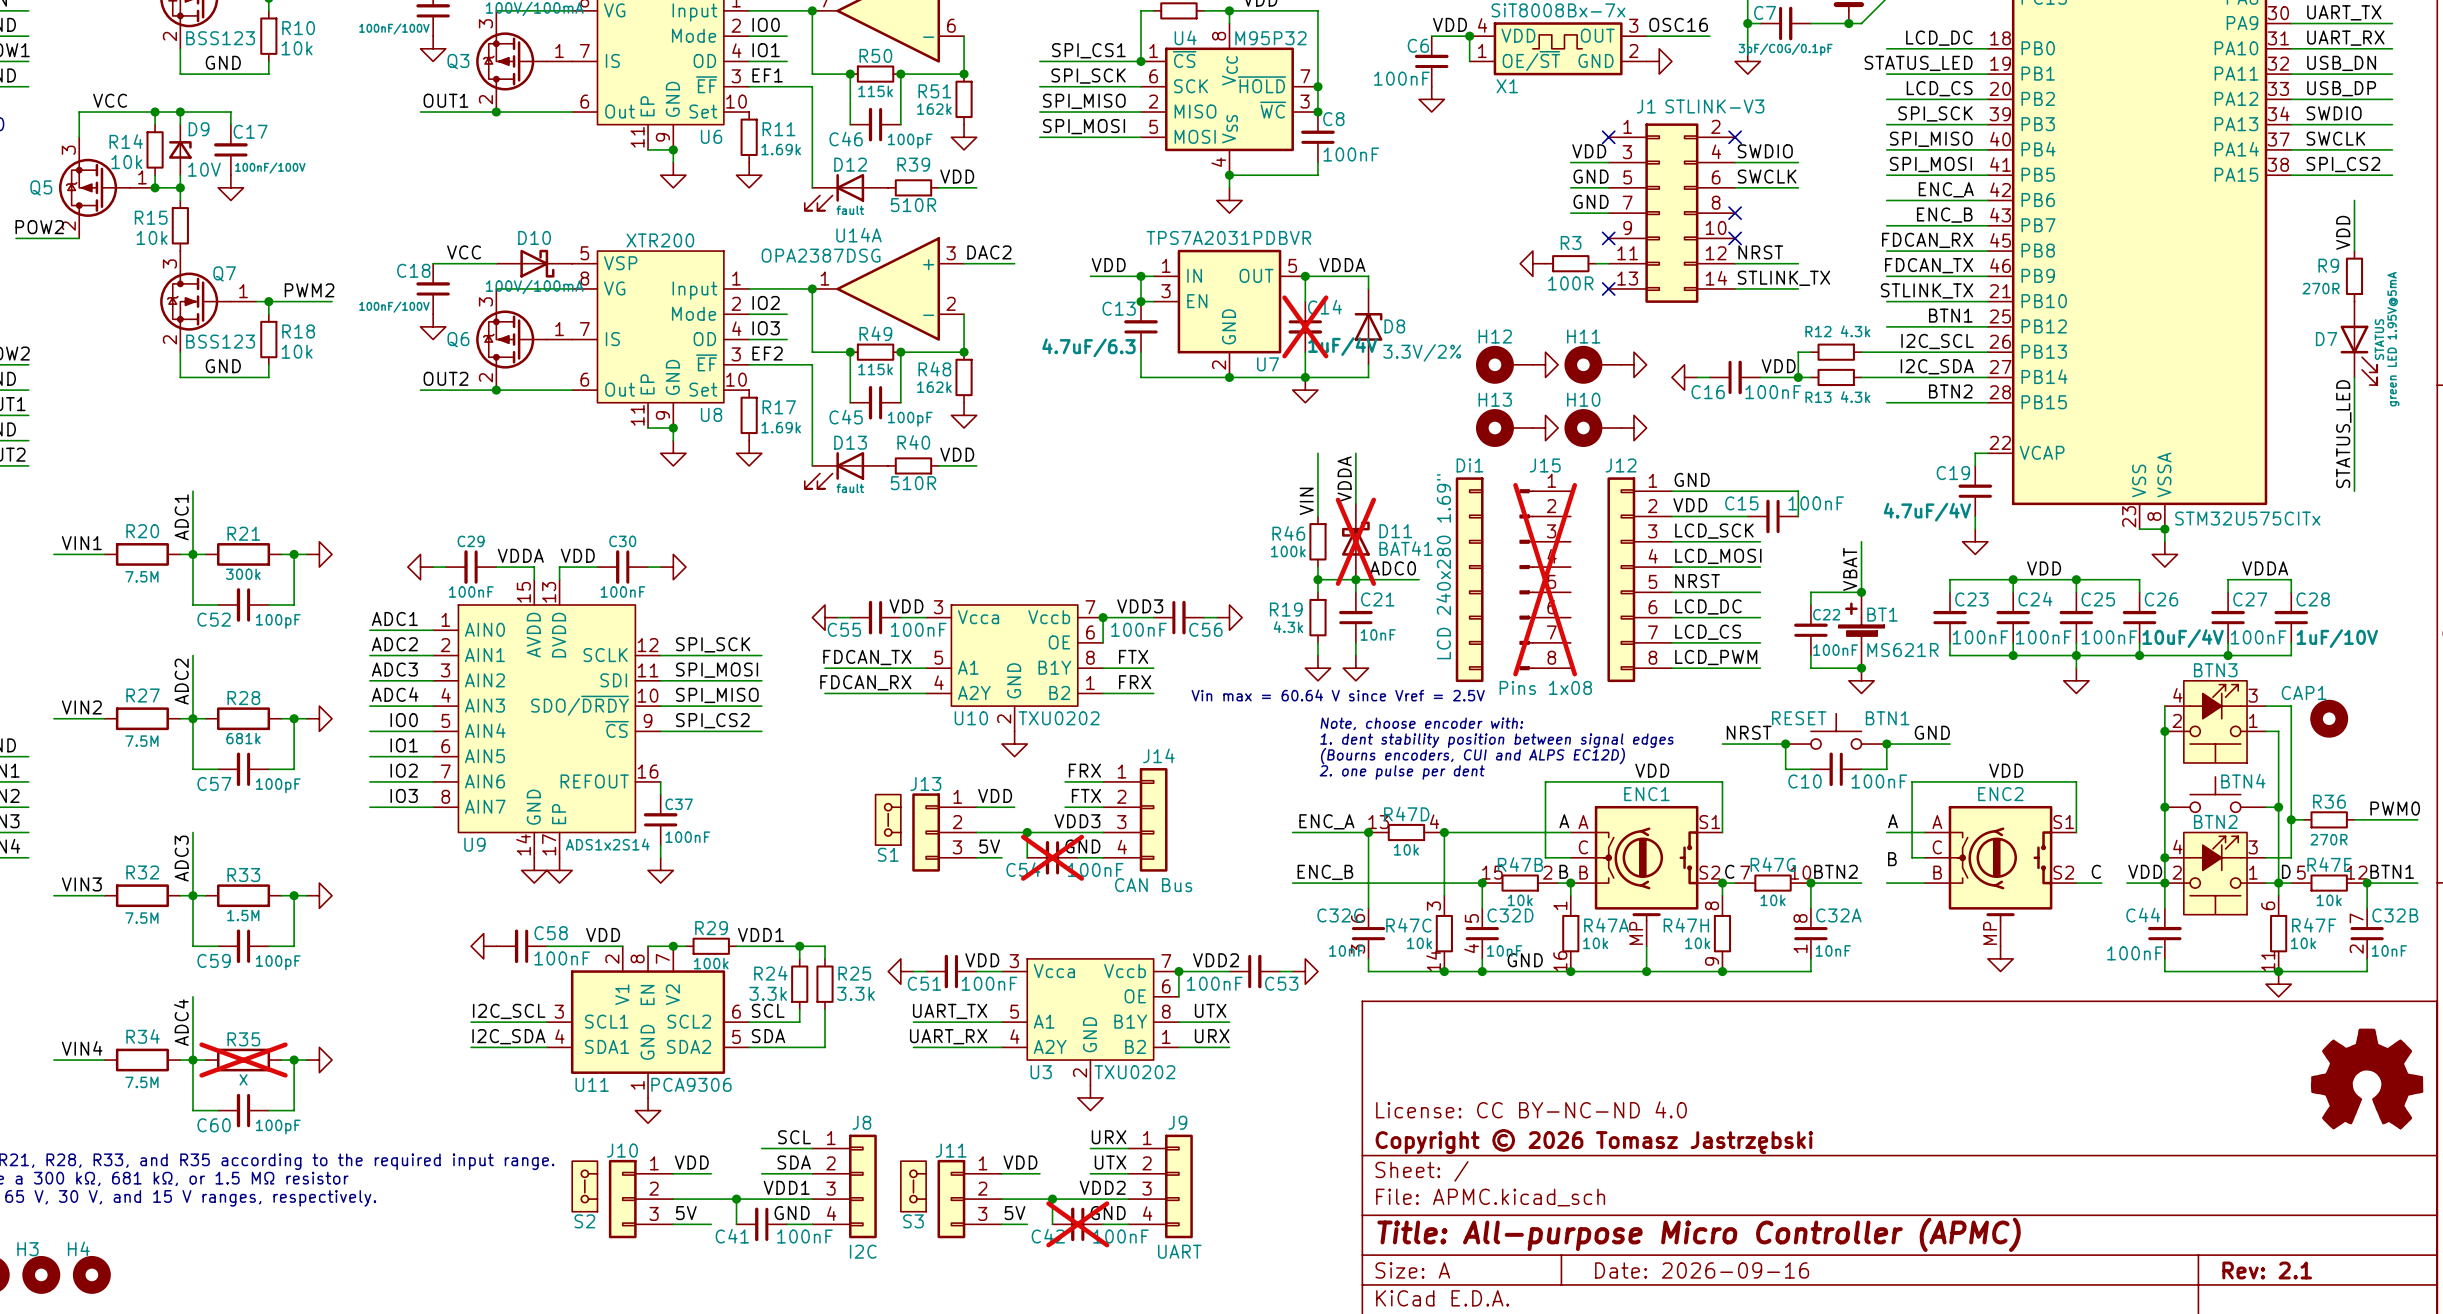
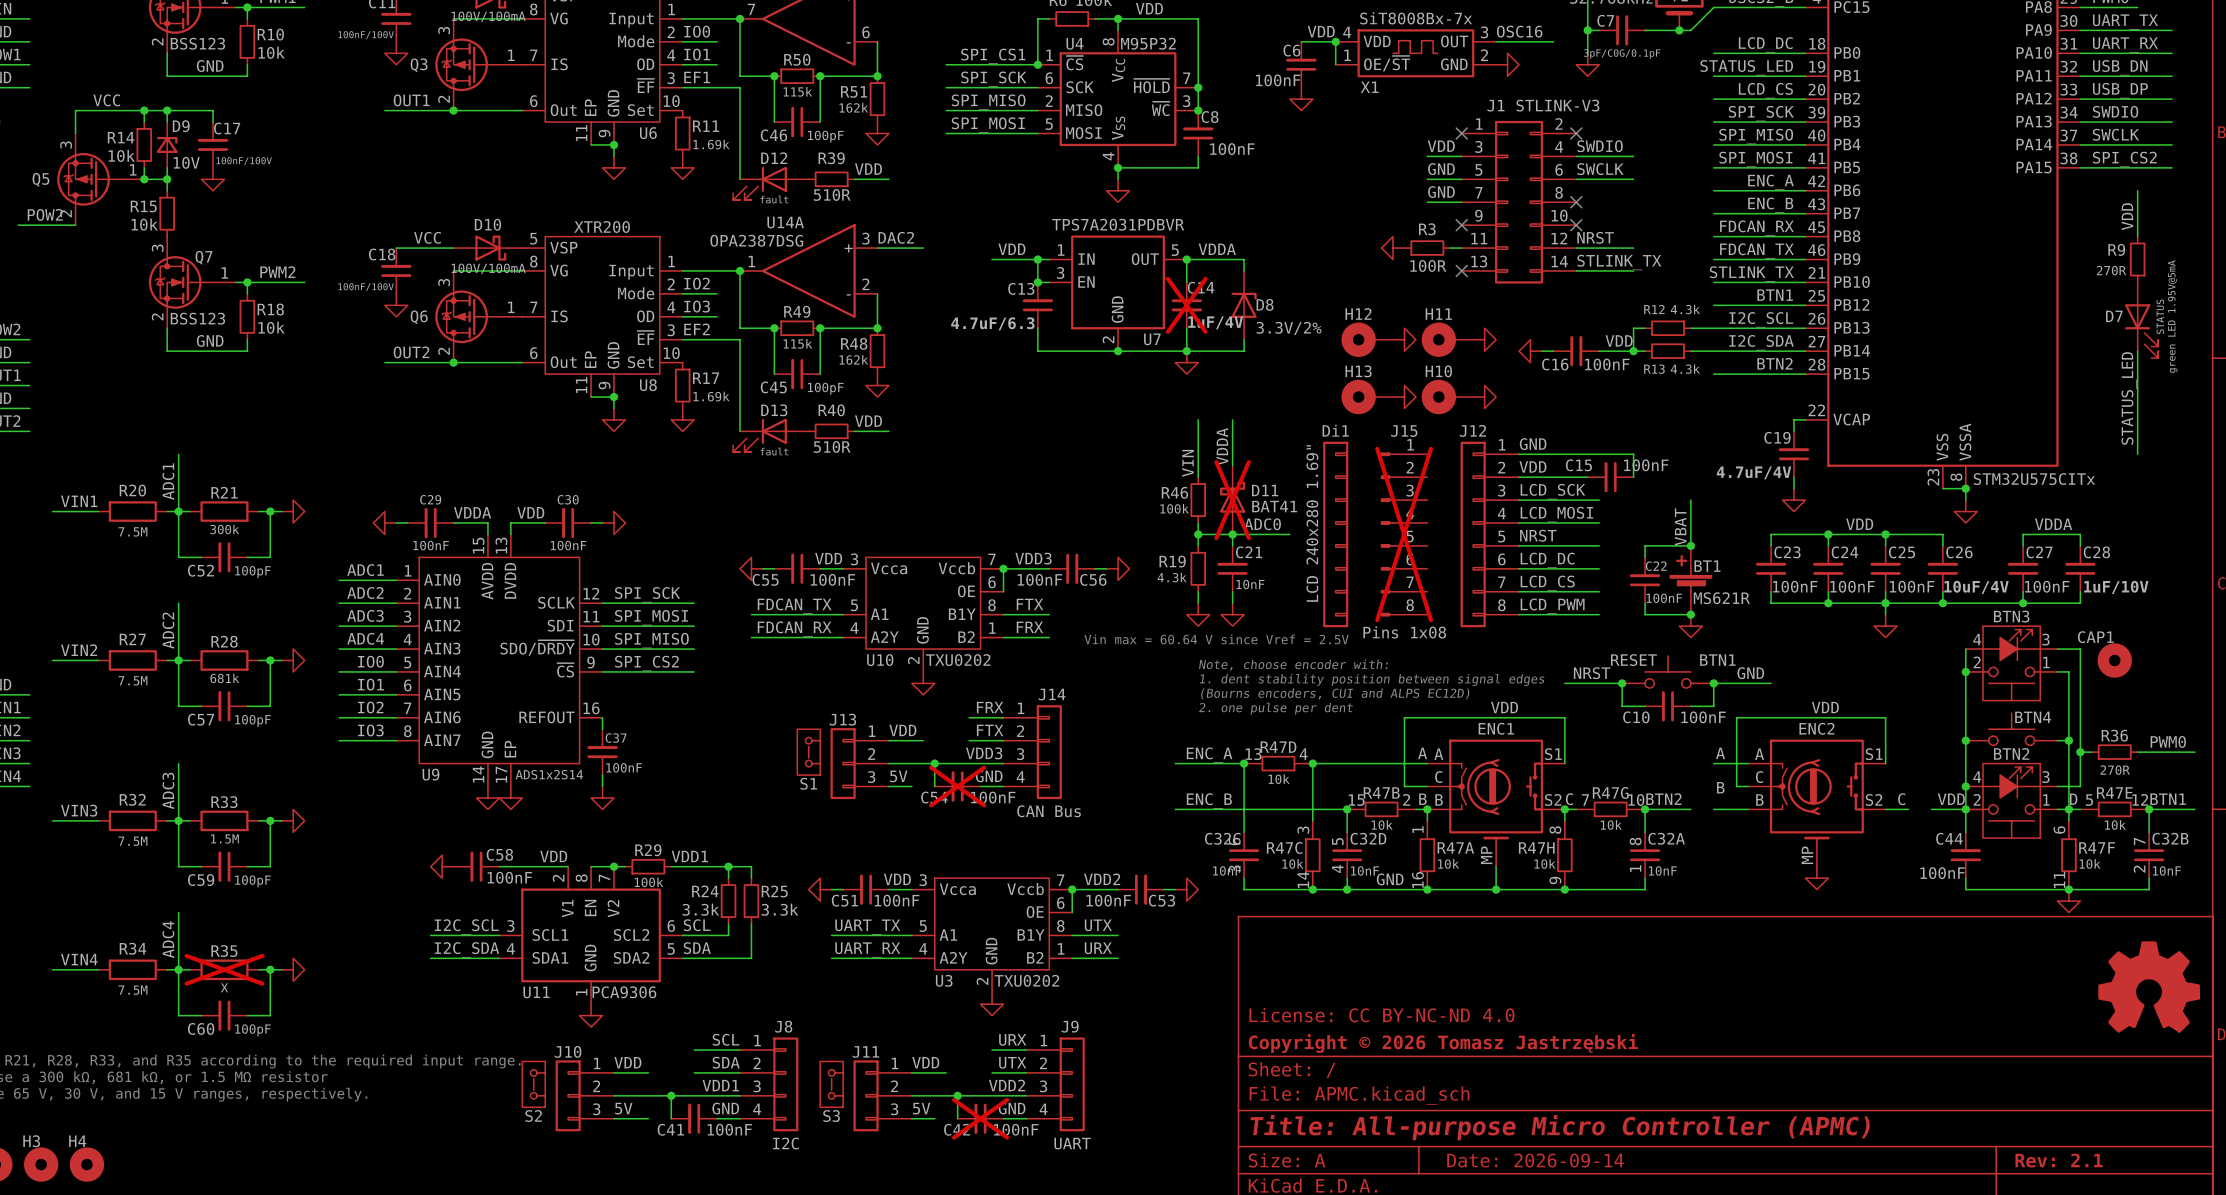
title block: Date: 2026-09-16 (1702, 1270) -> Date: 2026-09-14 (1535, 1160)

